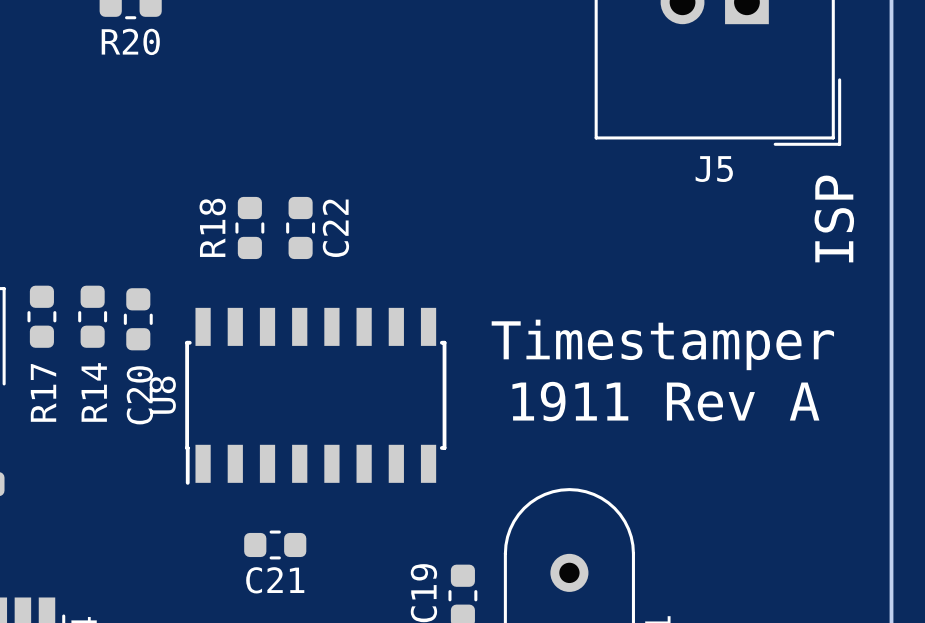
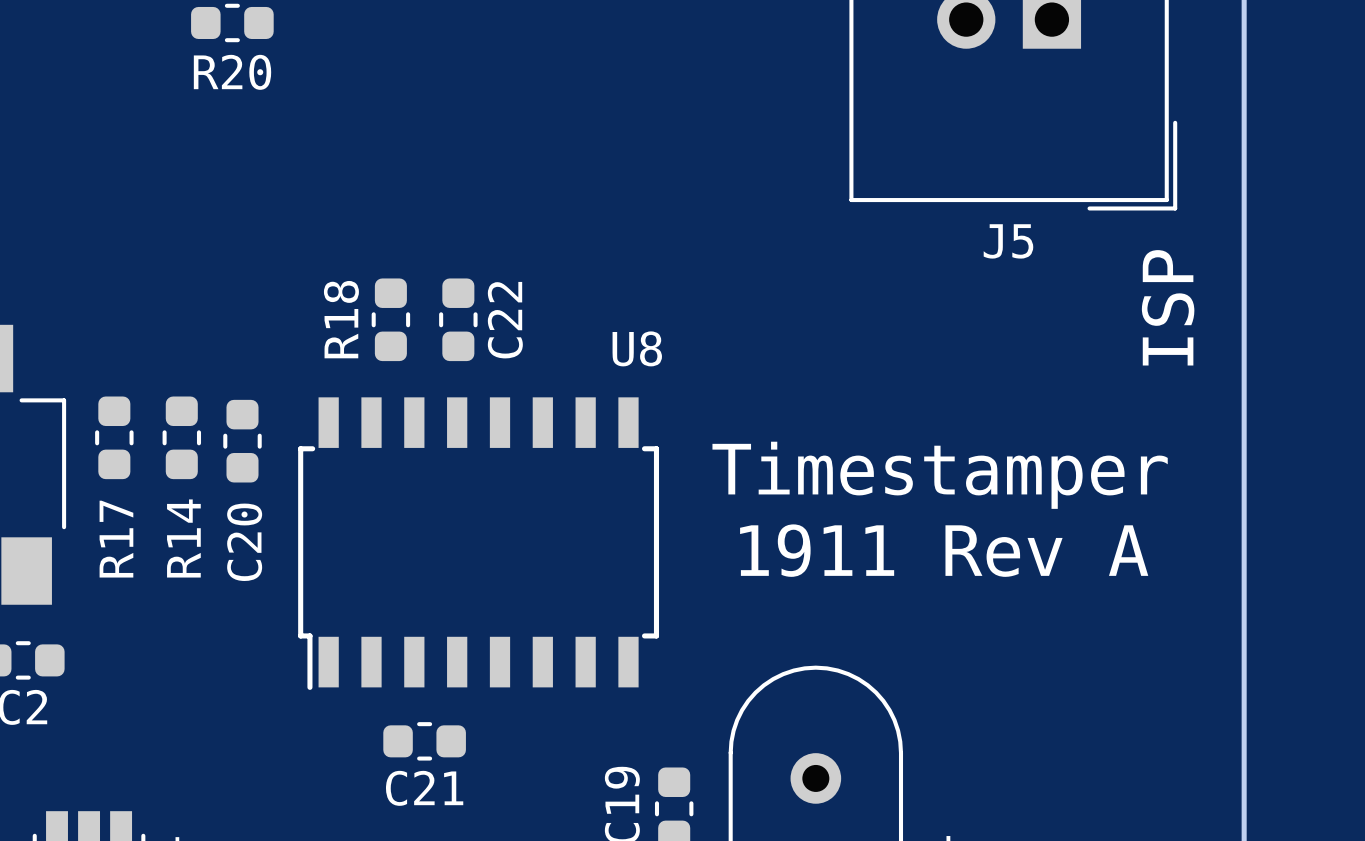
U8 footprint: [185, 307, 447, 485] -> [298, 397, 660, 690]
U8 name rotation: 0° (162, 395) -> 90° clockwise (637, 348)
U8 name position: U8 (162, 395) -> U8 (637, 348)

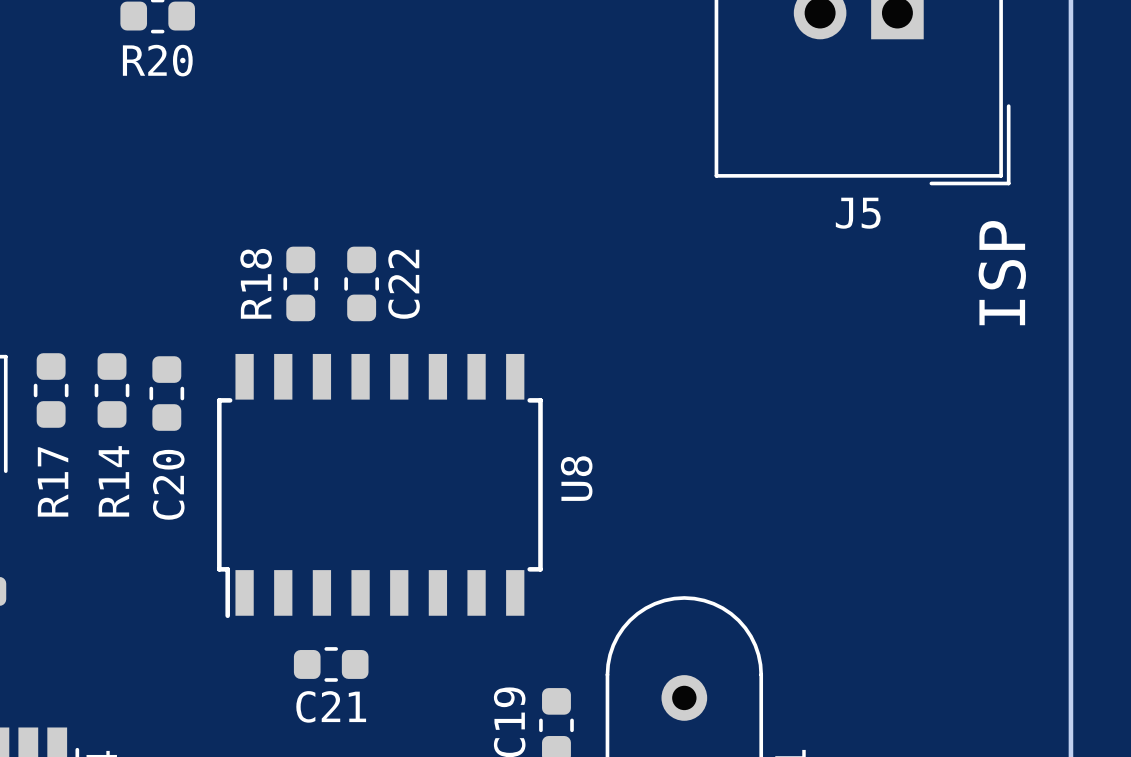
U8 name rotation: 0° (637, 348) -> 90° counterclockwise (576, 478)
U8 name position: U8 (637, 348) -> U8 (576, 478)
text: Timestamper (940, 475) -> none
text: 1911 Rev A (944, 550) -> none

